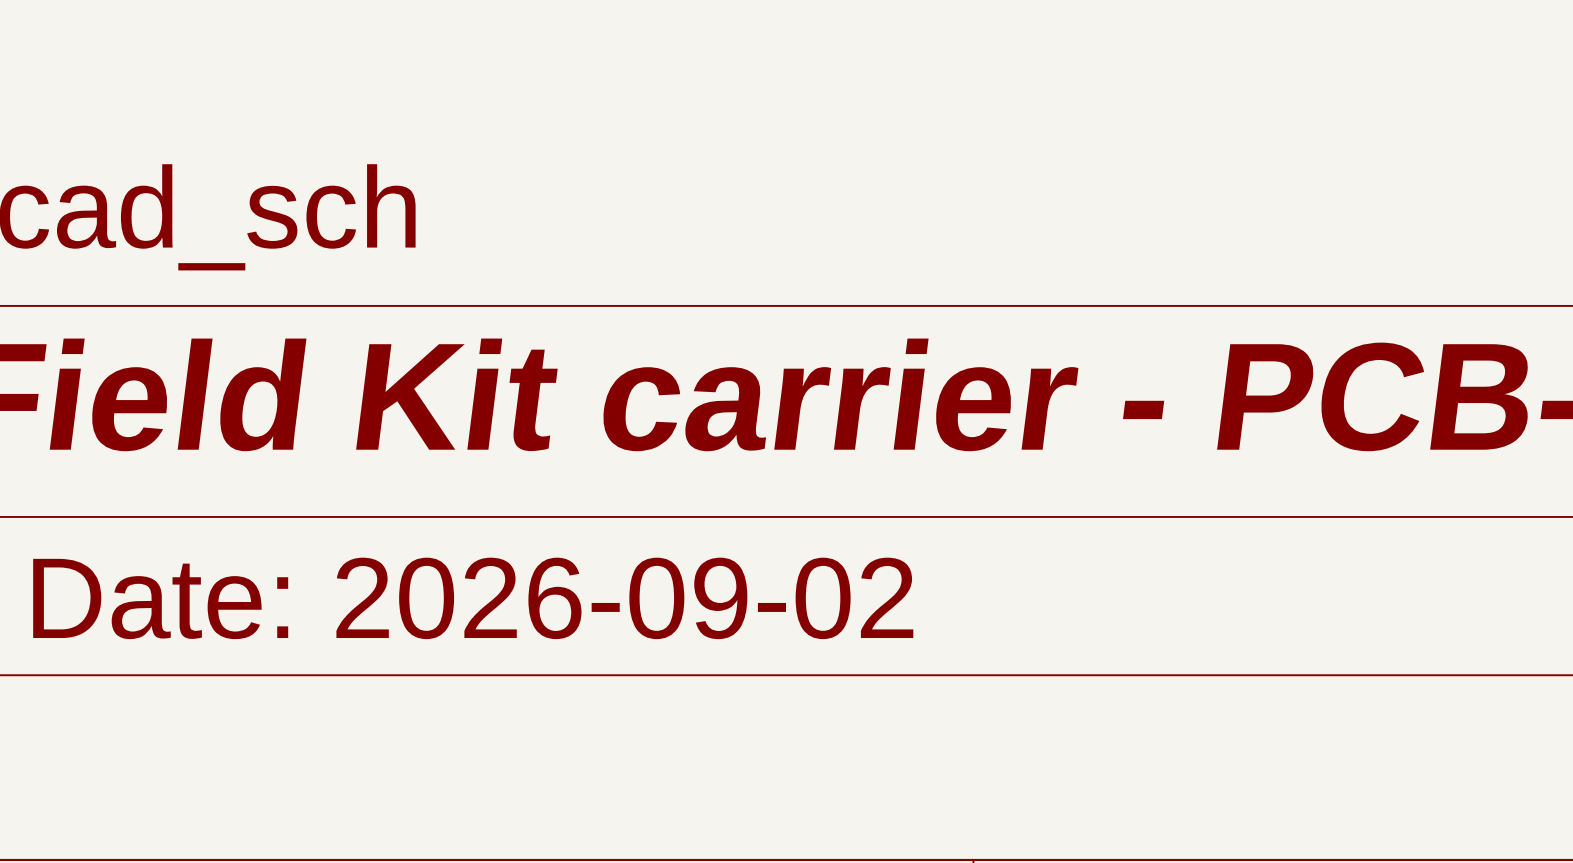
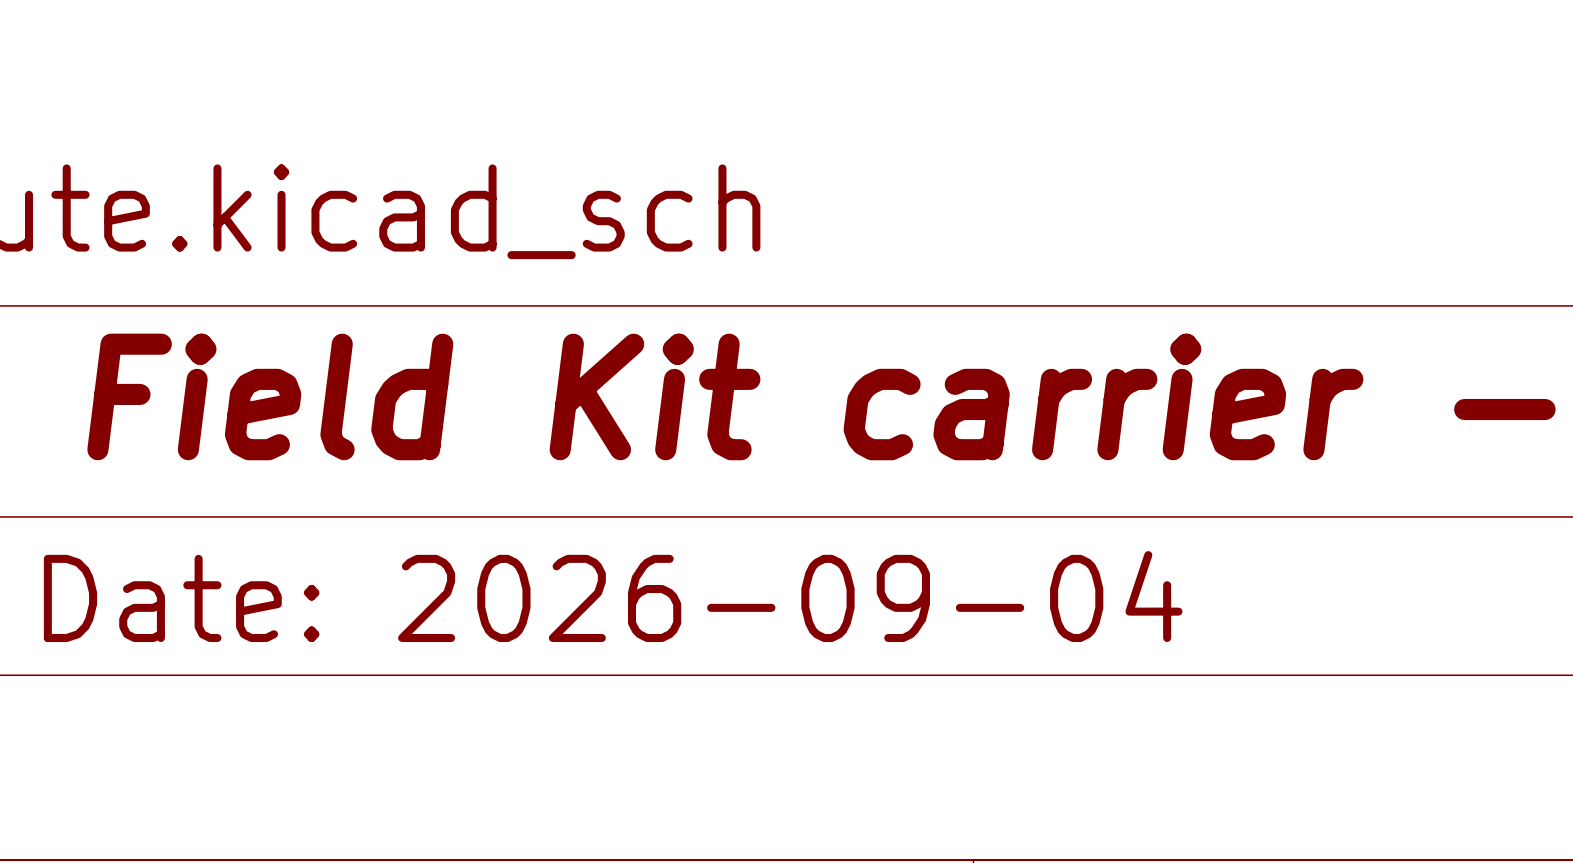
title block: Date: 2026-09-02 (473, 598) -> Date: 2026-09-04 (613, 596)

